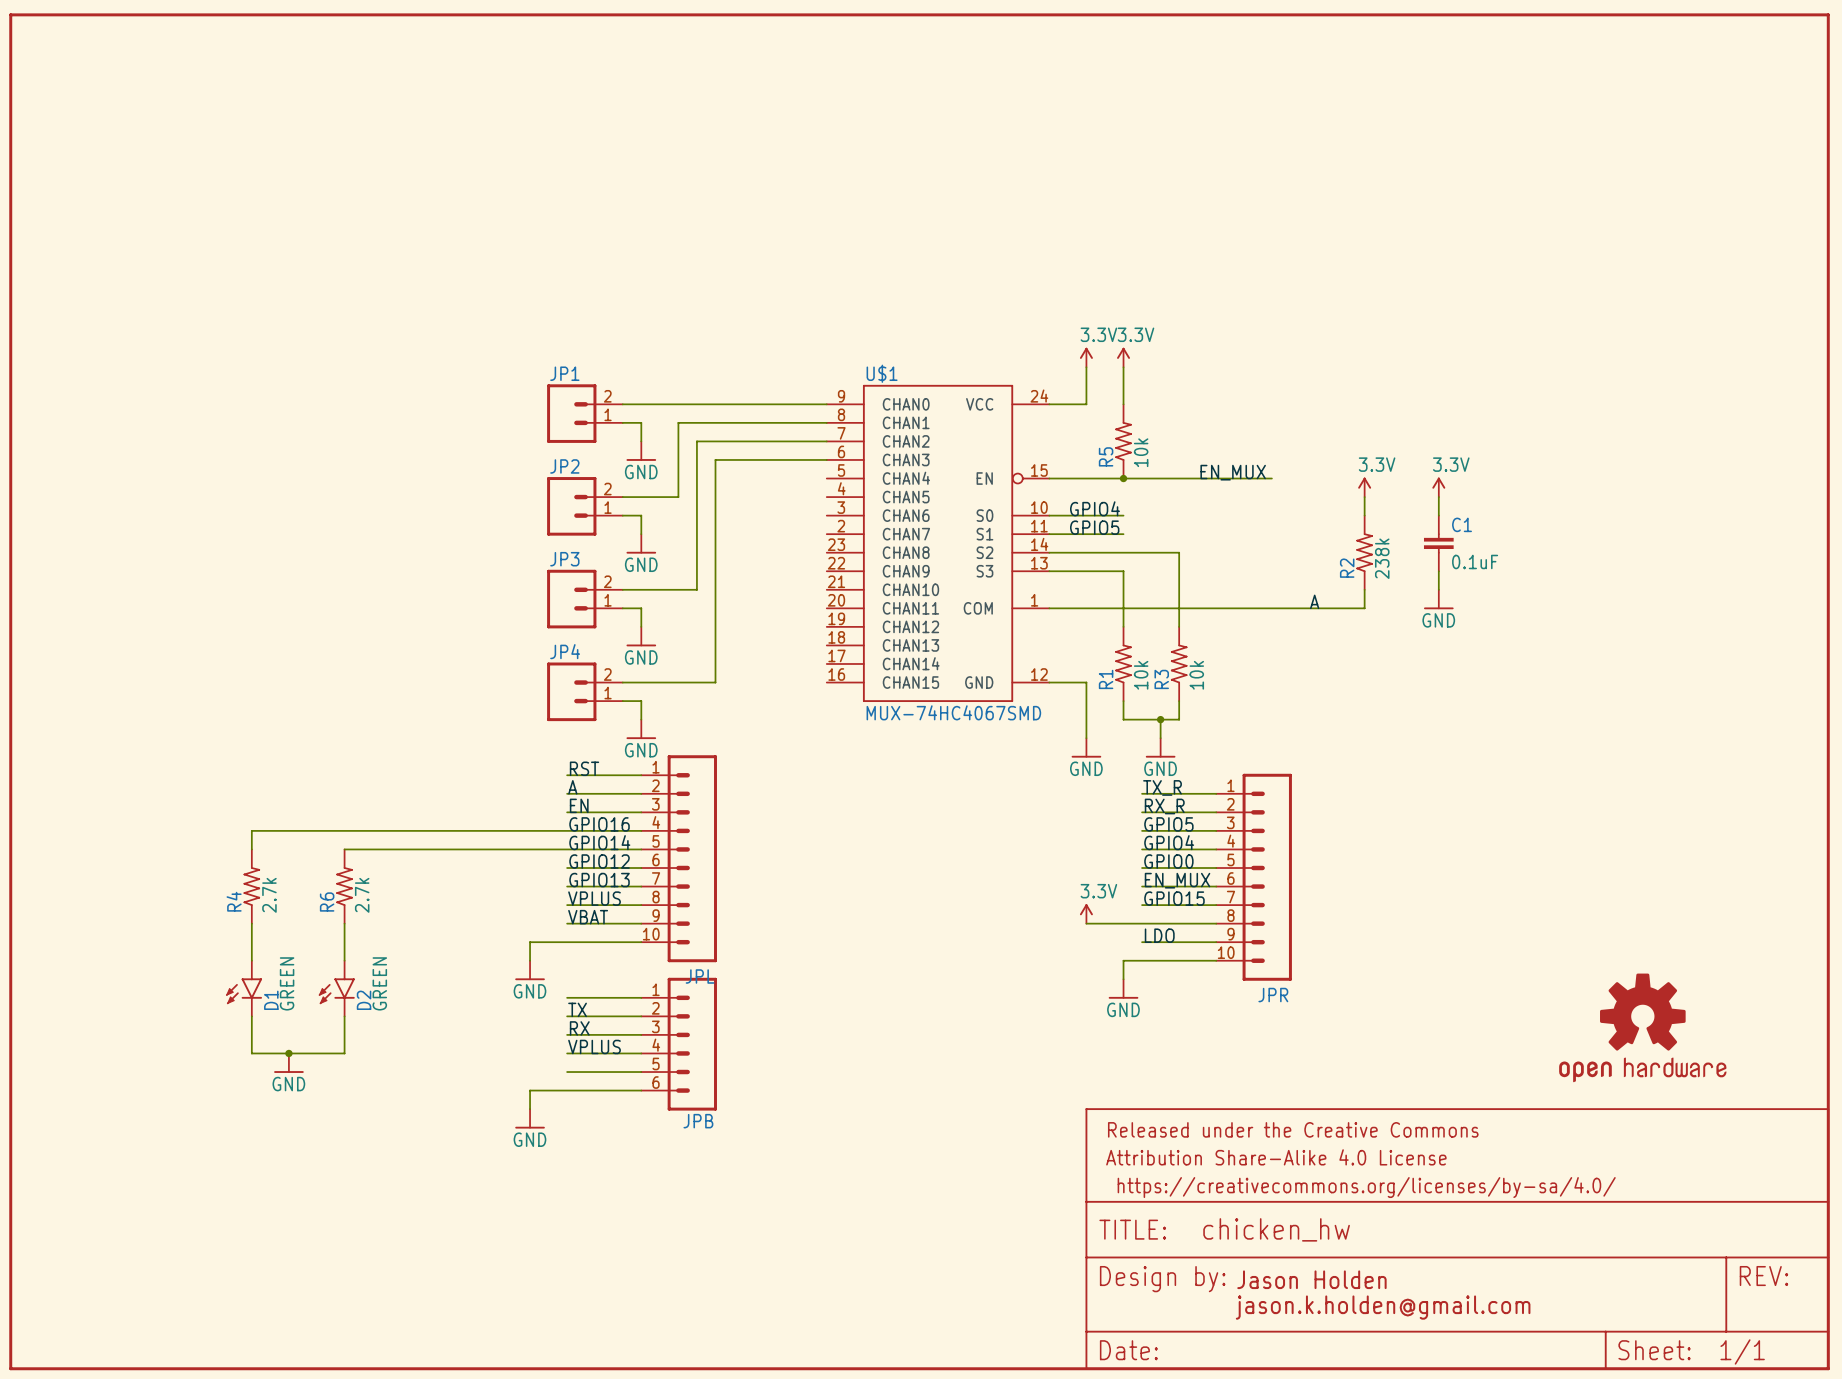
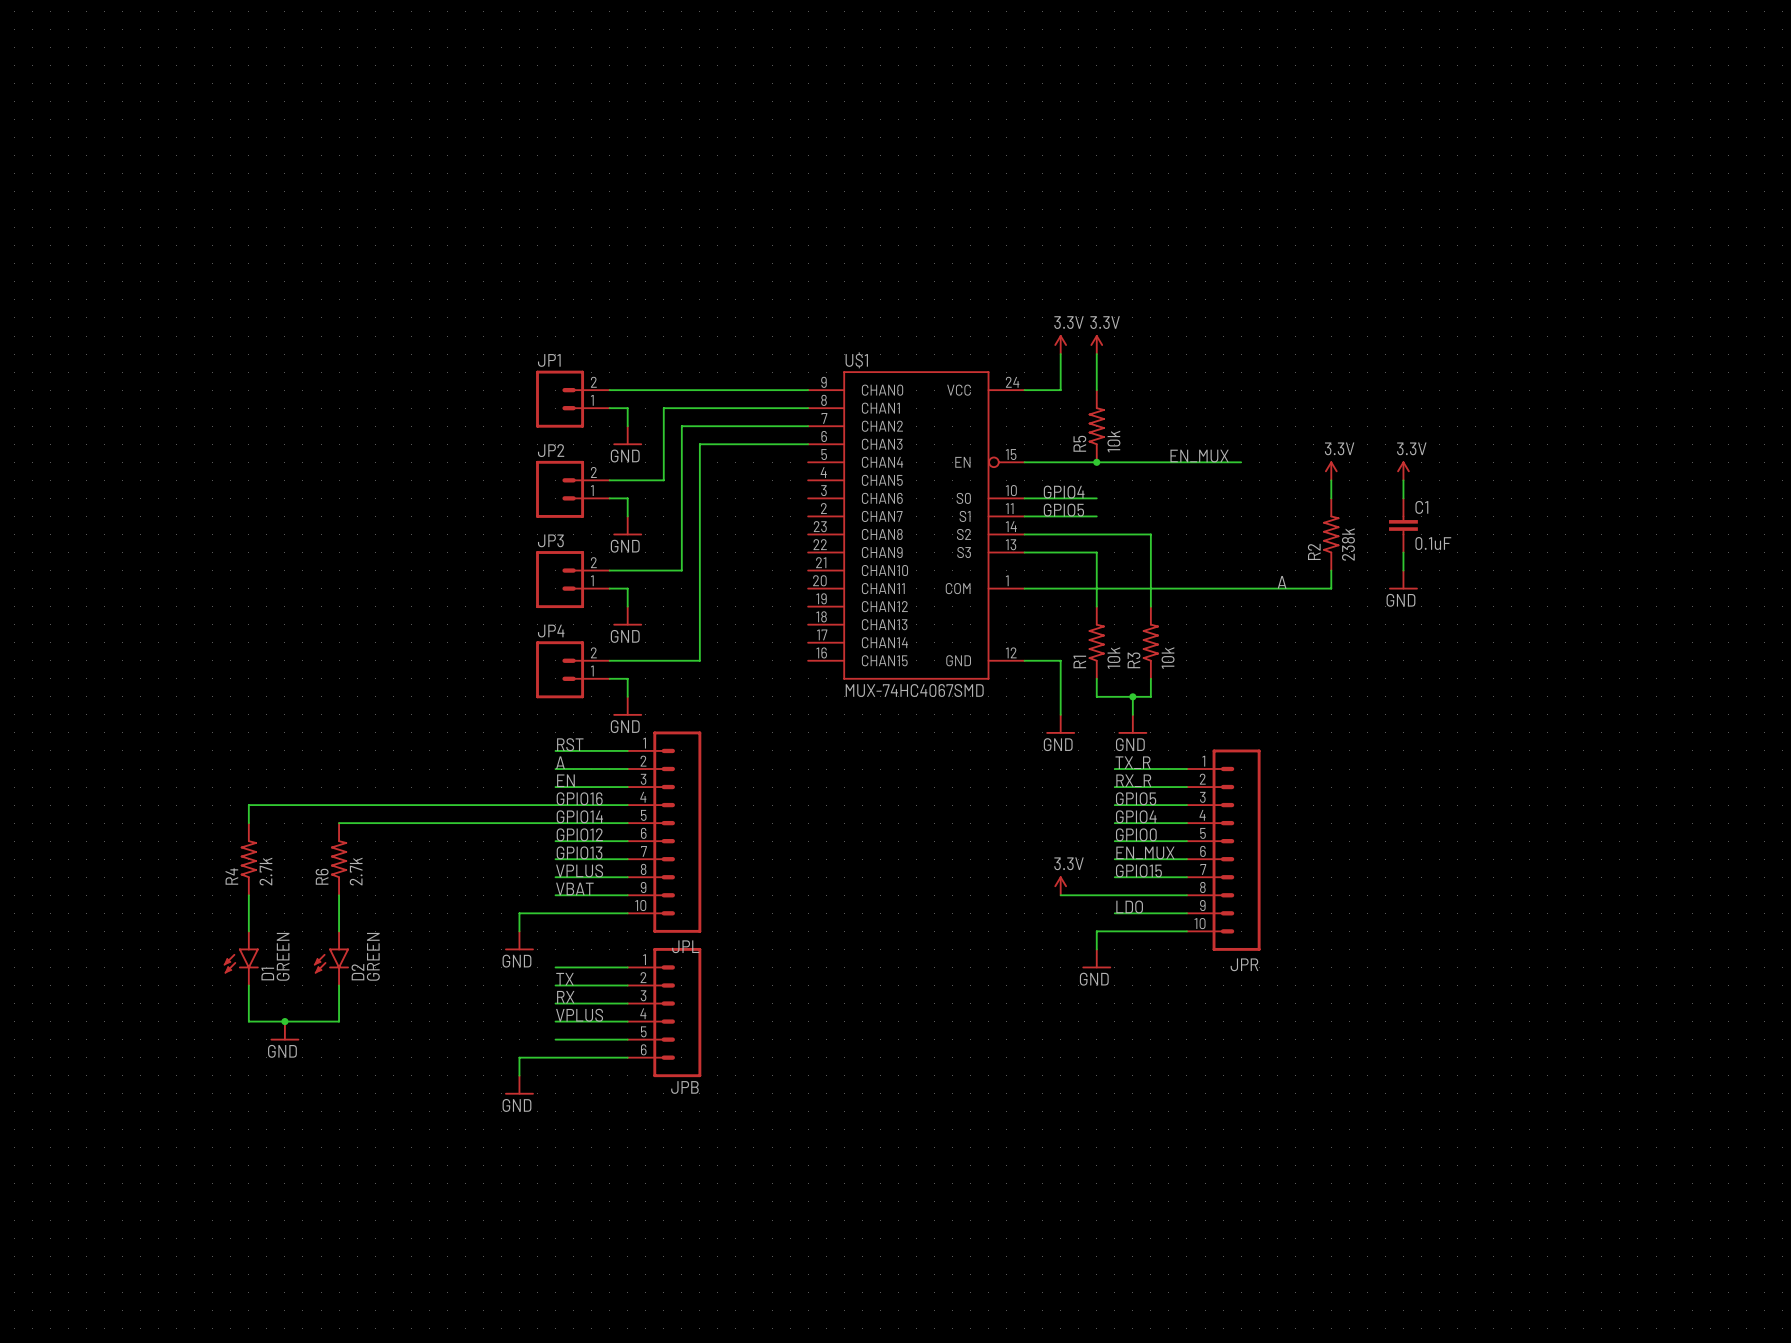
part: (919, 691) -> none
part: (1642, 1027) -> none
part: (1457, 1238) -> none
text: Jason Holden (1311, 1279) -> none
text: jason.k.holden@gmail.com (1383, 1307) -> none

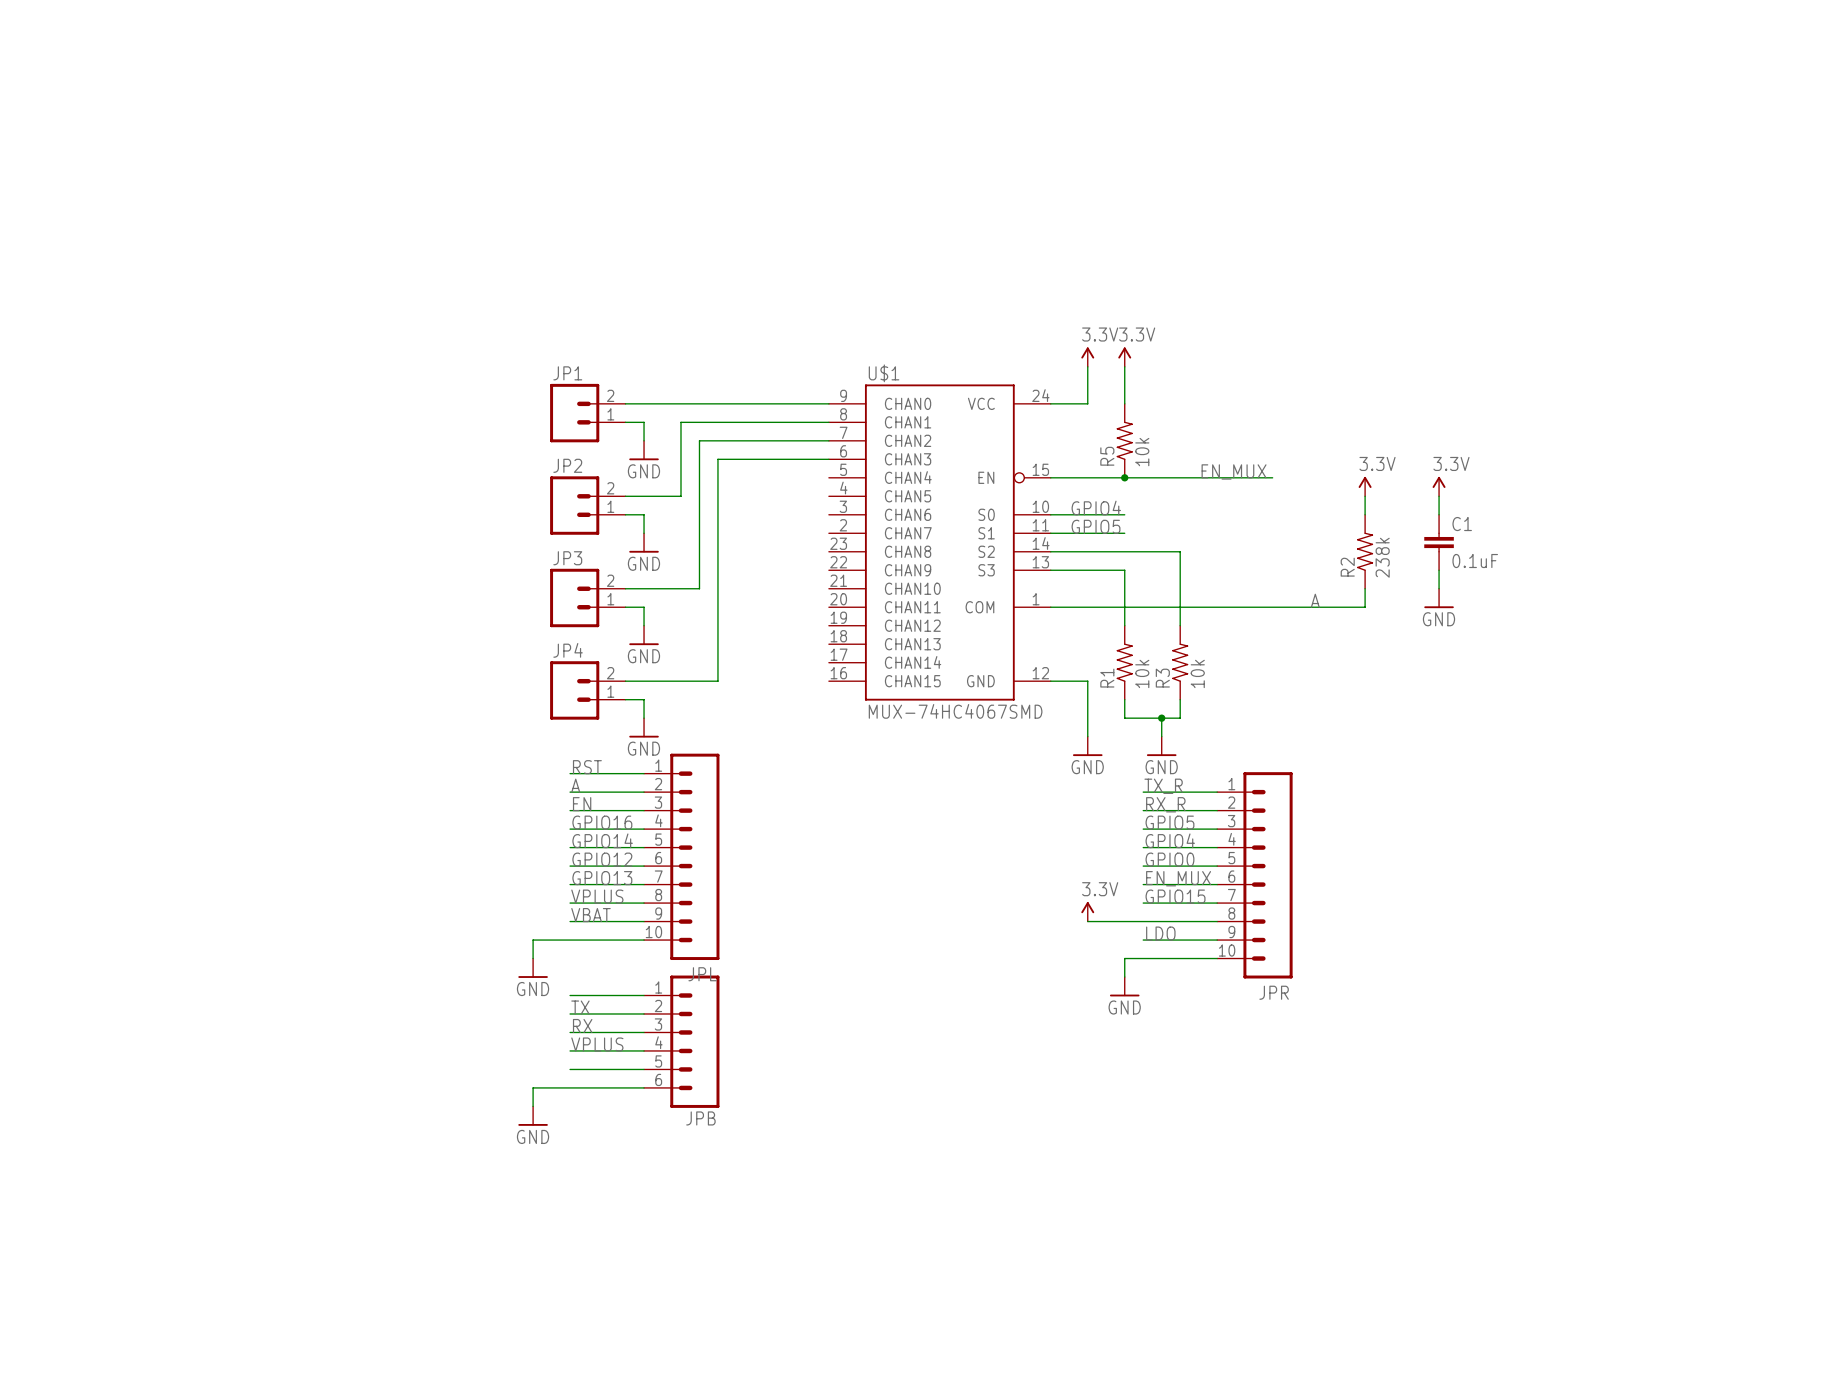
wire: (555, 805) (248, 805) (248, 823) -> none
wire: (339, 823) (555, 823) -> none
R4: 2.7k (248, 859) -> none
R6: 2.7k (339, 859) -> none
wire: (248, 895) (248, 931) -> none
wire: (339, 895) (339, 931) -> none
D1: GREEN (241, 958) -> none
D2: GREEN (331, 958) -> none
wire: (248, 985) (248, 1021) (339, 1021) (339, 985) -> none
junction: (284, 1021) -> none
power symbol: GND (284, 1031) -> none

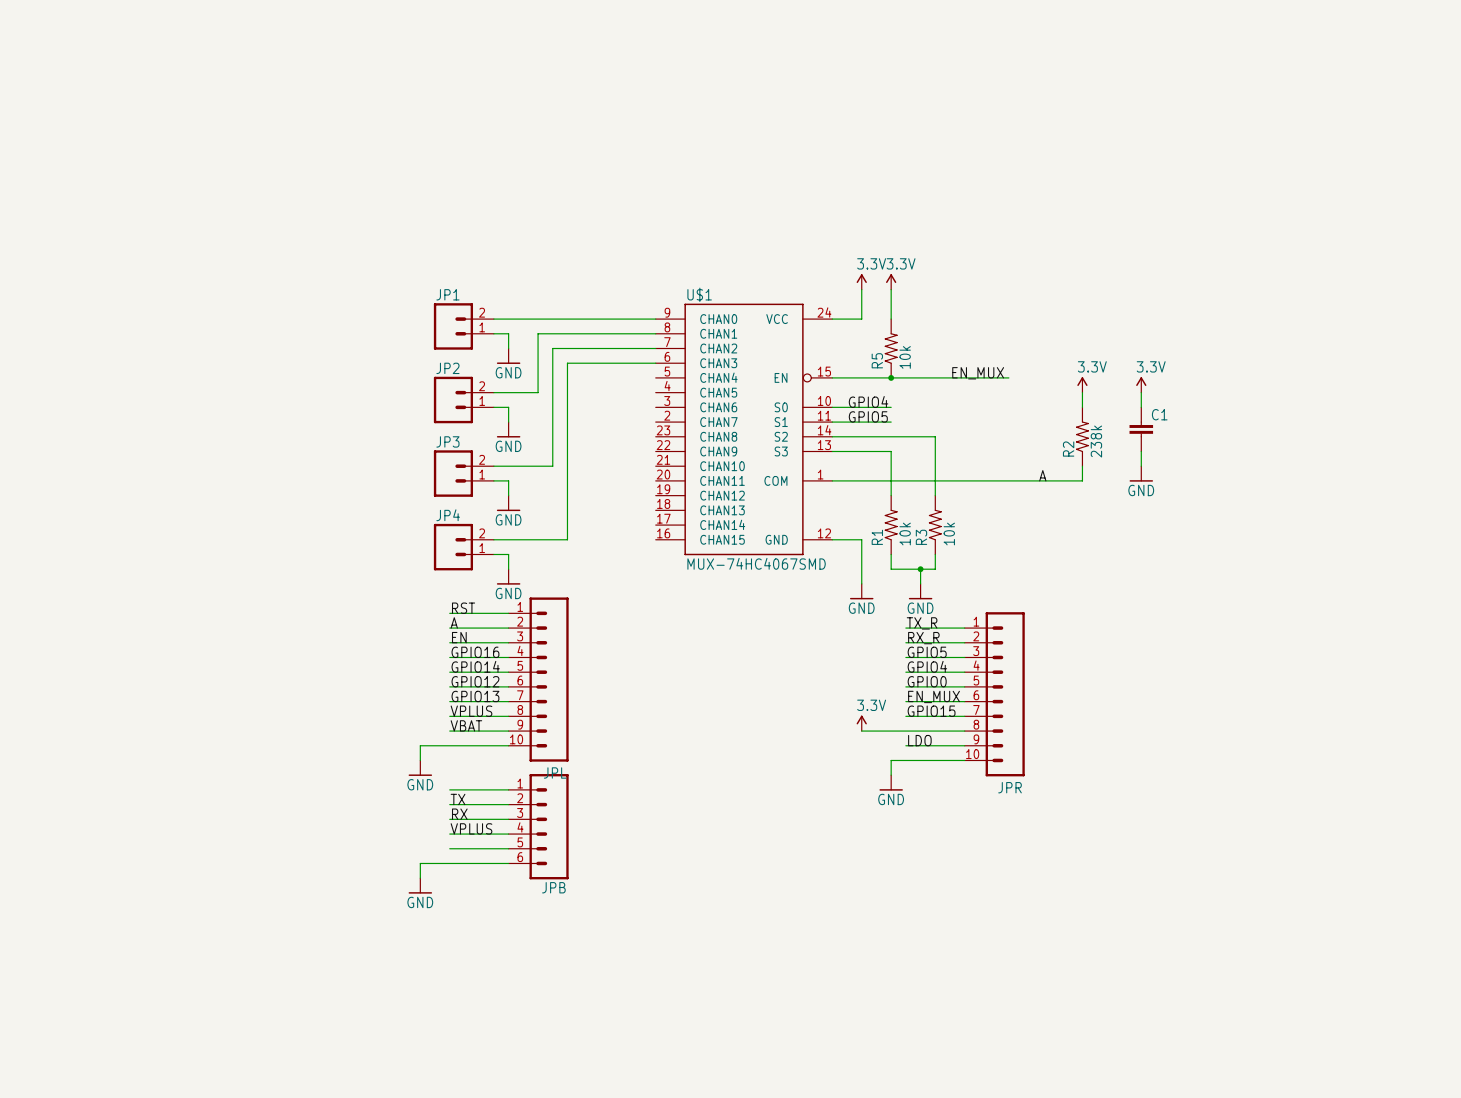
C1 value: 0.1uF (1475, 561) -> none

